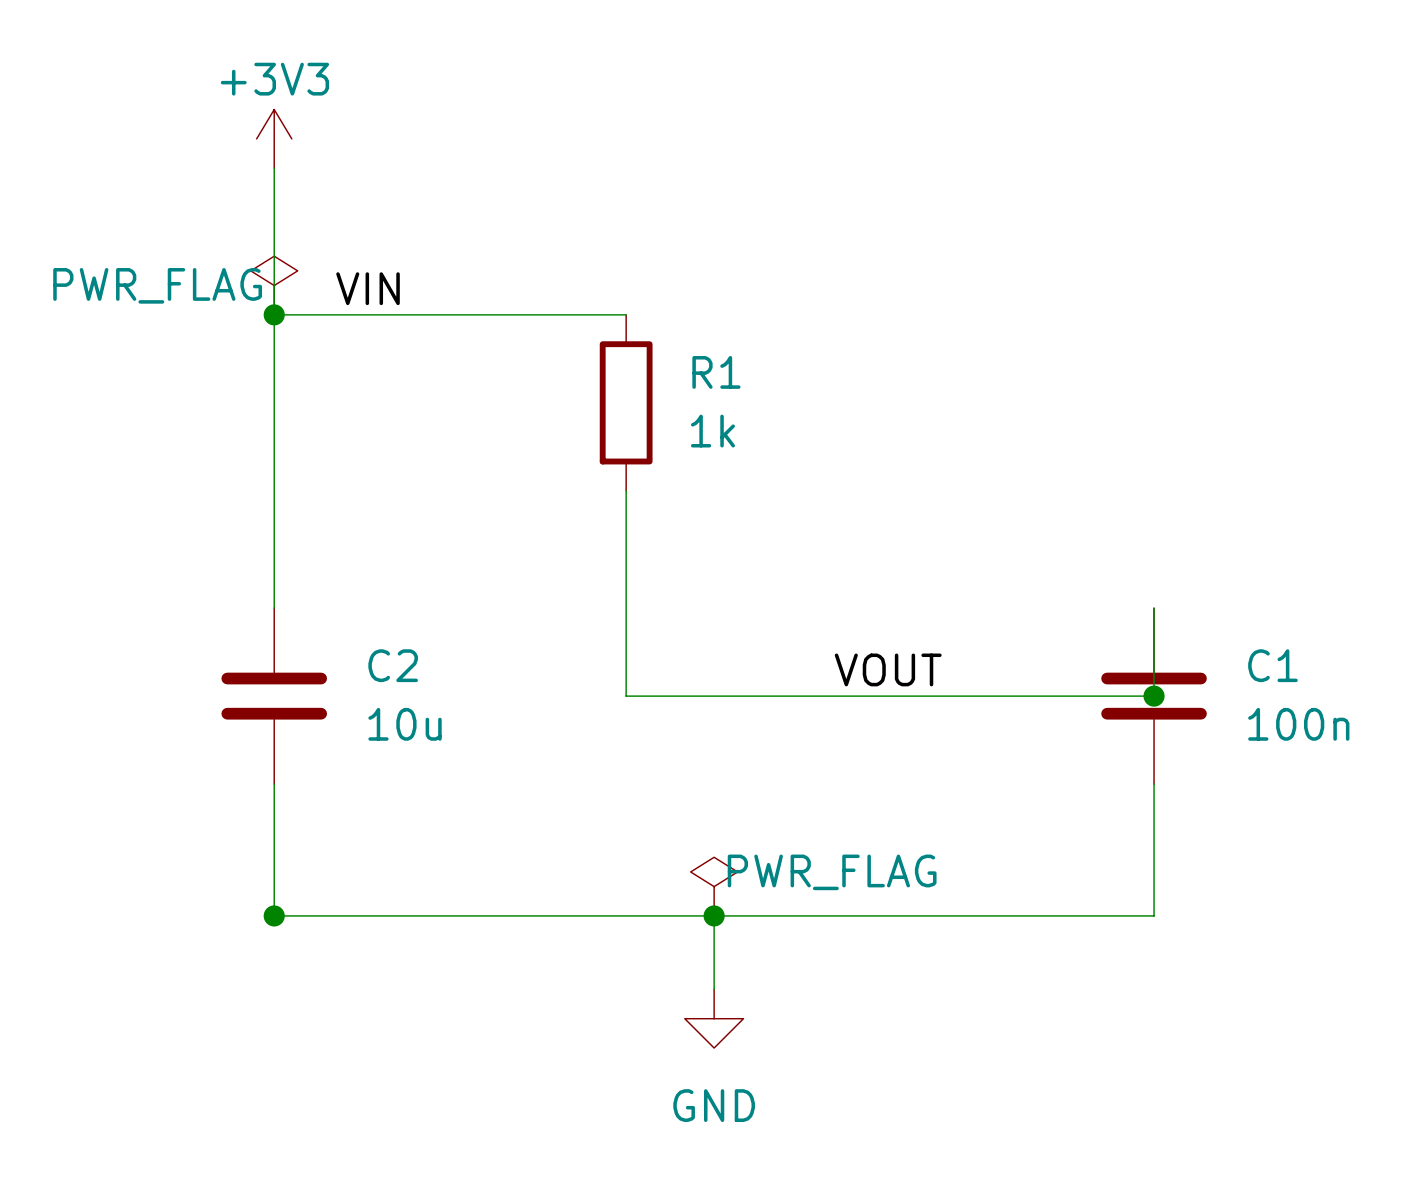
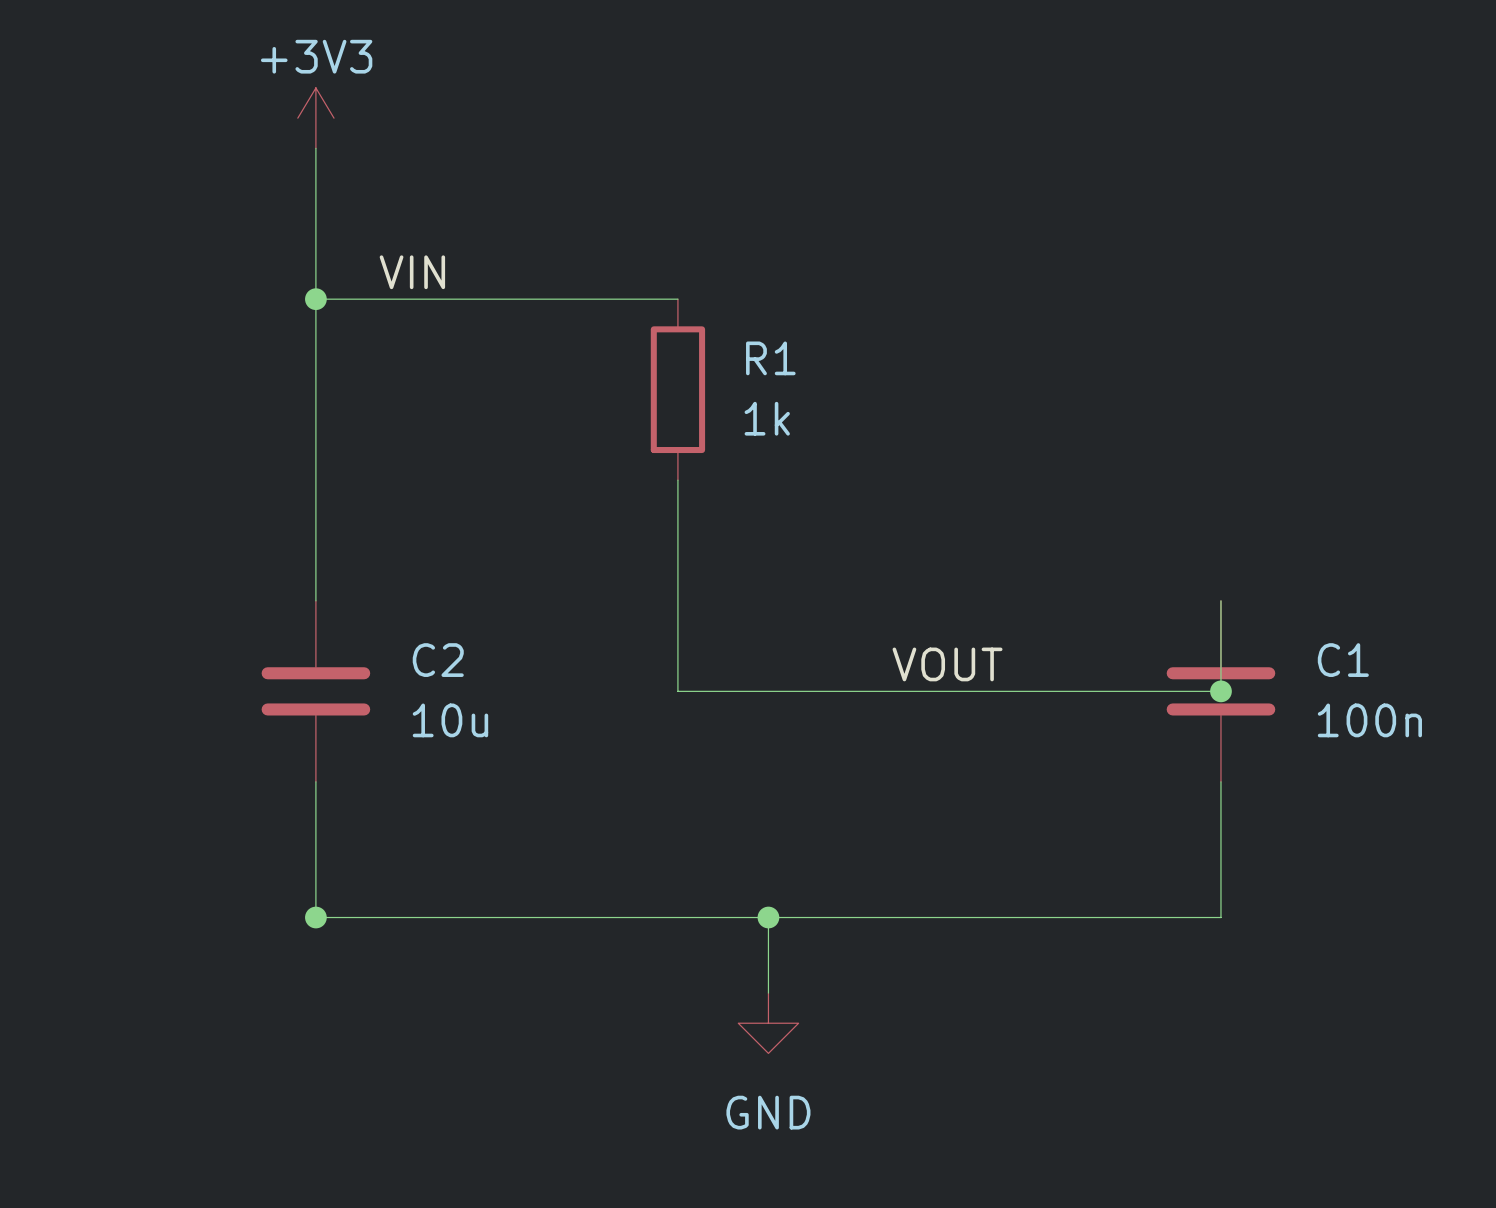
power symbol: PWR_FLAG (274, 285) -> none
power symbol: PWR_FLAG (714, 886) -> none

